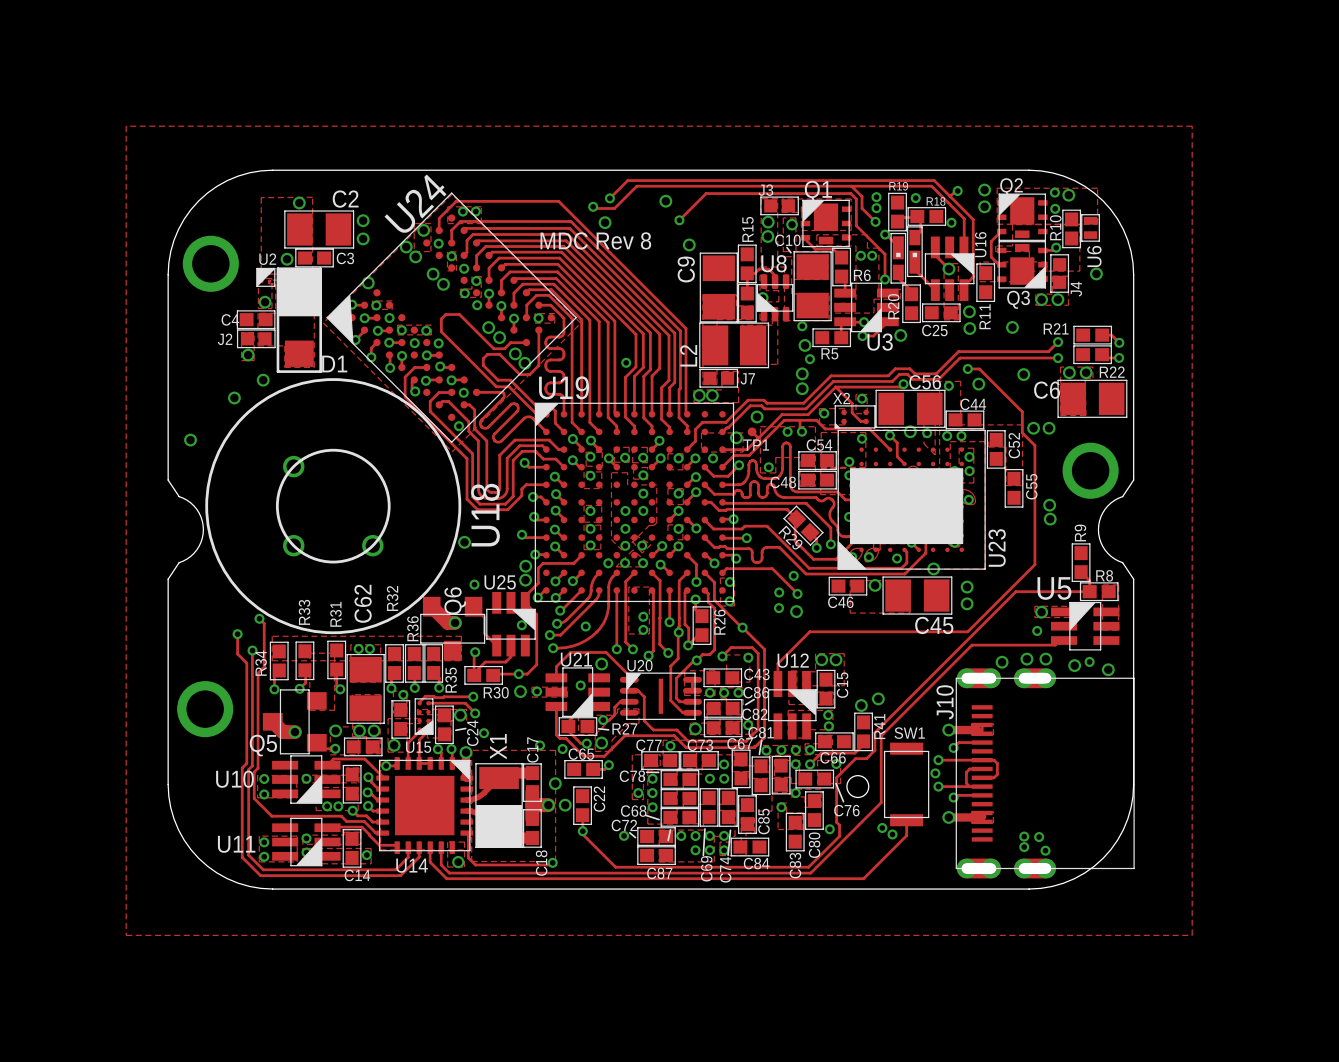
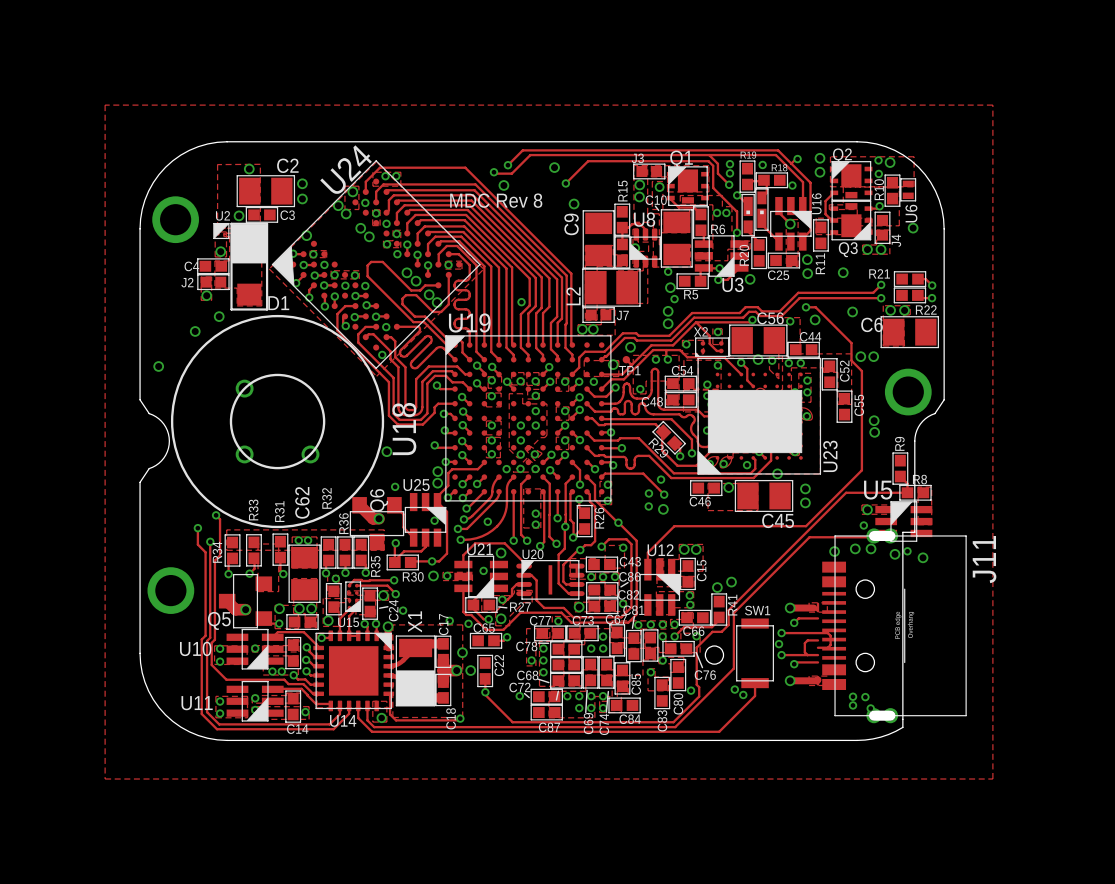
drawing: [1098, 480, 1134, 580] -> none
board edge: none -> (914, 441) (914, 532) (902, 532)
board edge: (1133, 579) (1133, 784) (1127, 819) (1110, 849) (1094, 866) (1063, 883) (1029, 889) -> (902, 719) (902, 727) (895, 731) (880, 737) (857, 740)
J11: none -> (894, 625)
J10: (1045, 773) -> none

